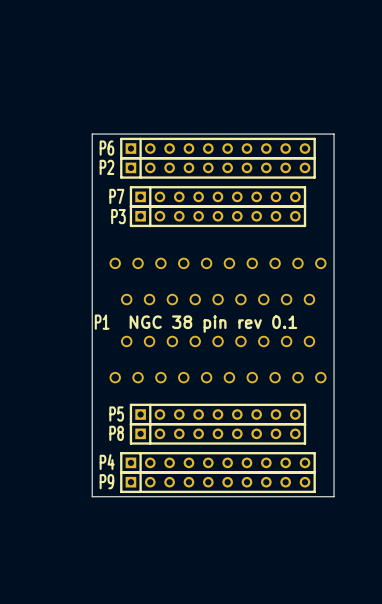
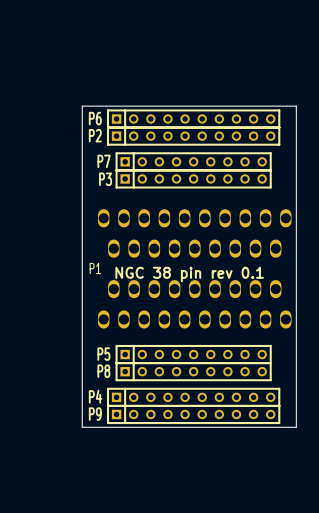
P1 footprint: [109, 257, 327, 384] -> [97, 209, 292, 329]

